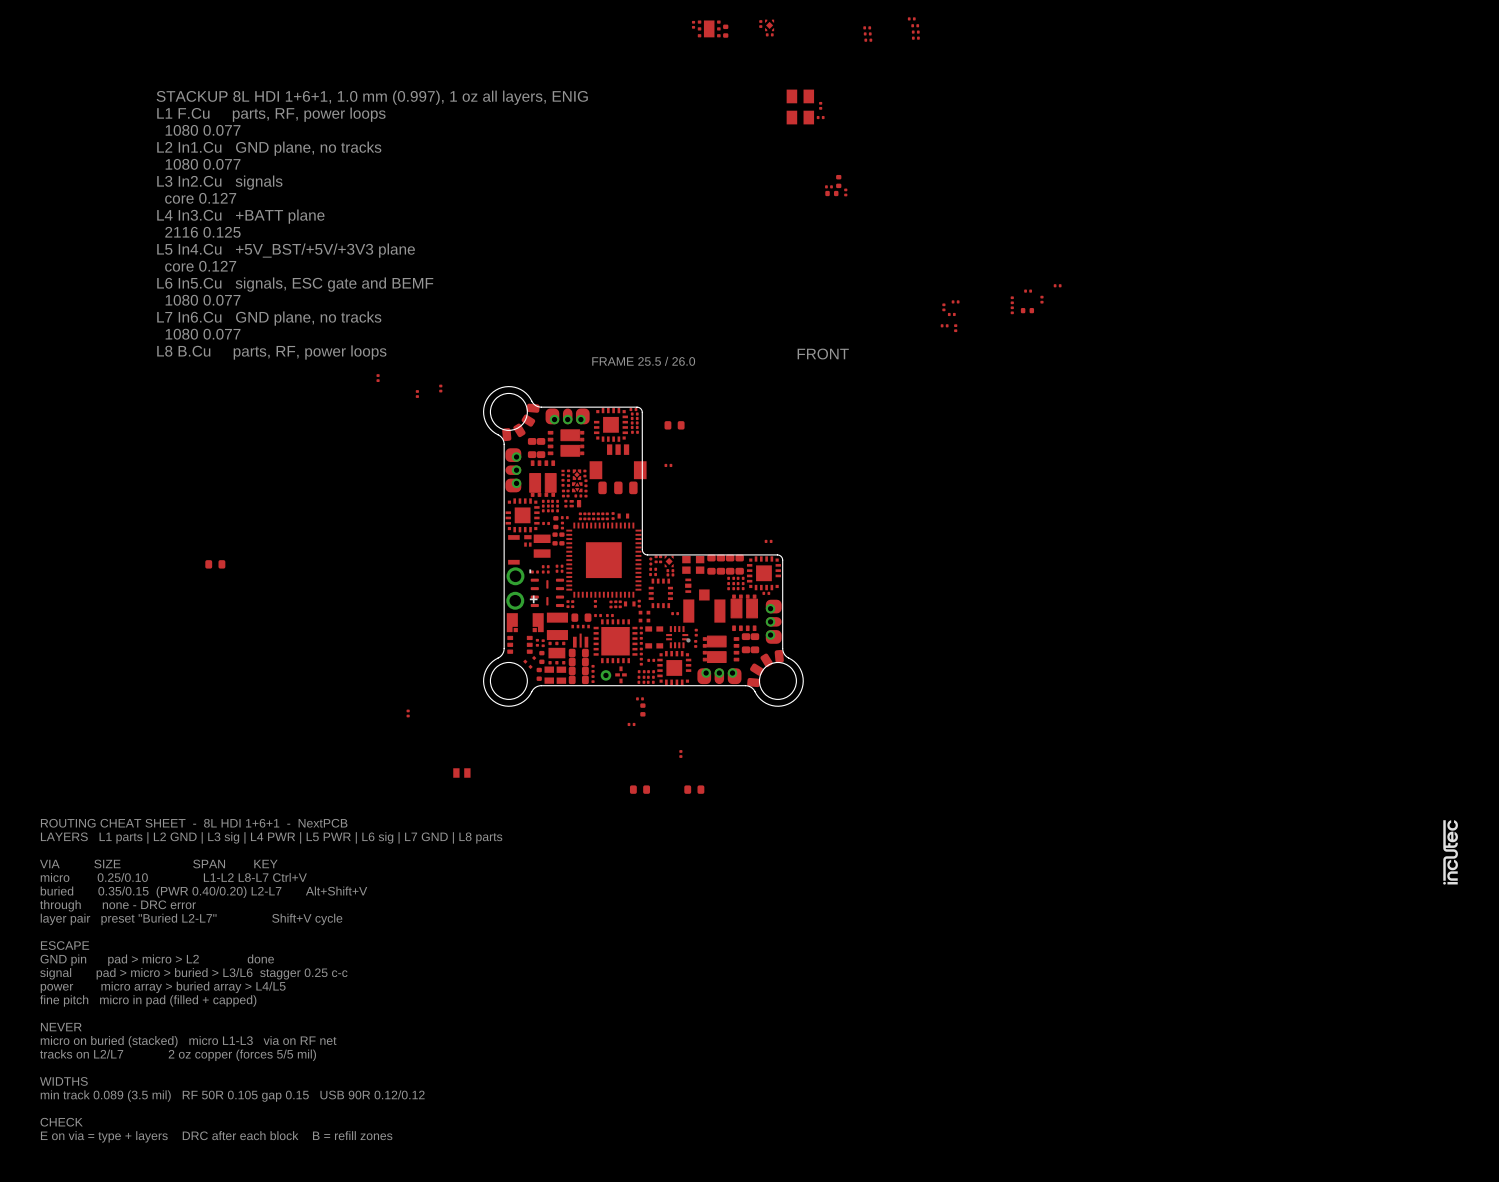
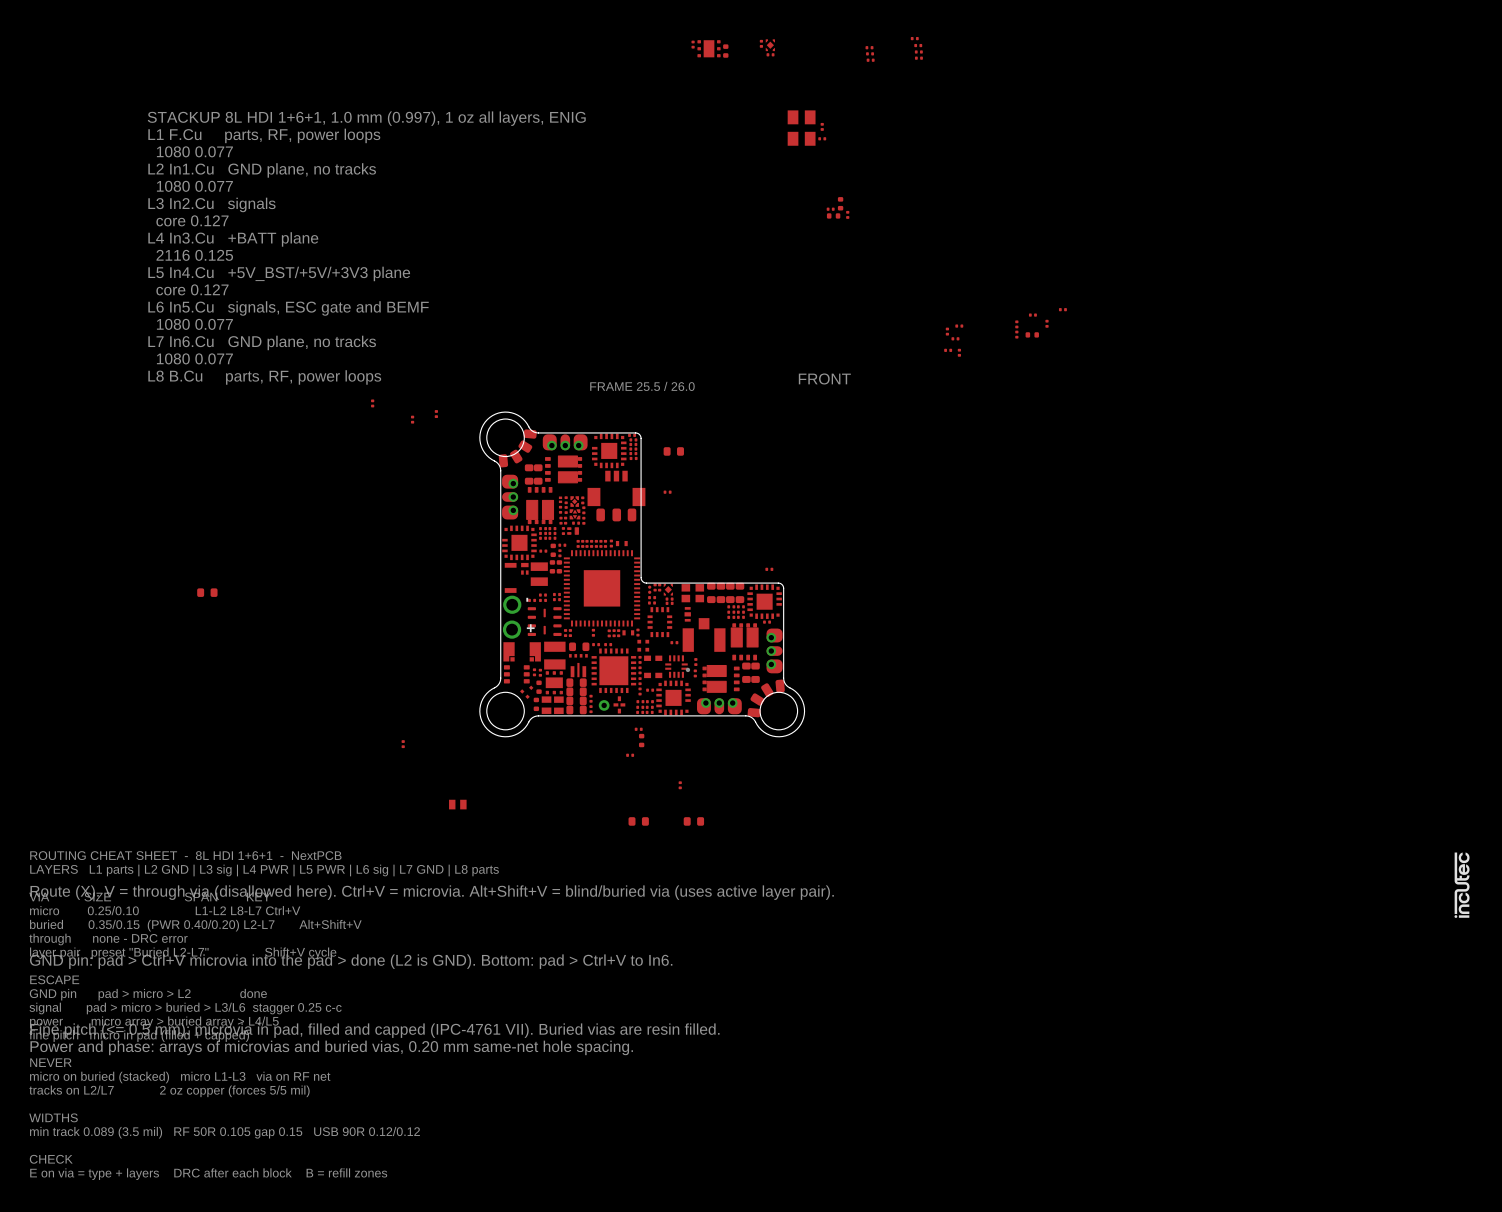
text: none -> Route (X). V = through via (disallowed here). Ctrl+V = microvia. Alt+Shift+V = blind/buried via (uses active layer pair). (432, 892)
text: none -> GND pin: pad > Ctrl+V microvia into the pad > done (L2 is GND). Bottom: pad > Ctrl+V to In6. (351, 961)
text: none -> Fine pitch (<= 0.5 mm): microvia in pad, filled and capped (IPC-4761 VII). Buried vias are resin filled. (375, 1030)
text: none -> Power and phase: arrays of microvias and buried vias, 0.20 mm same-net hole spacing. (331, 1047)

